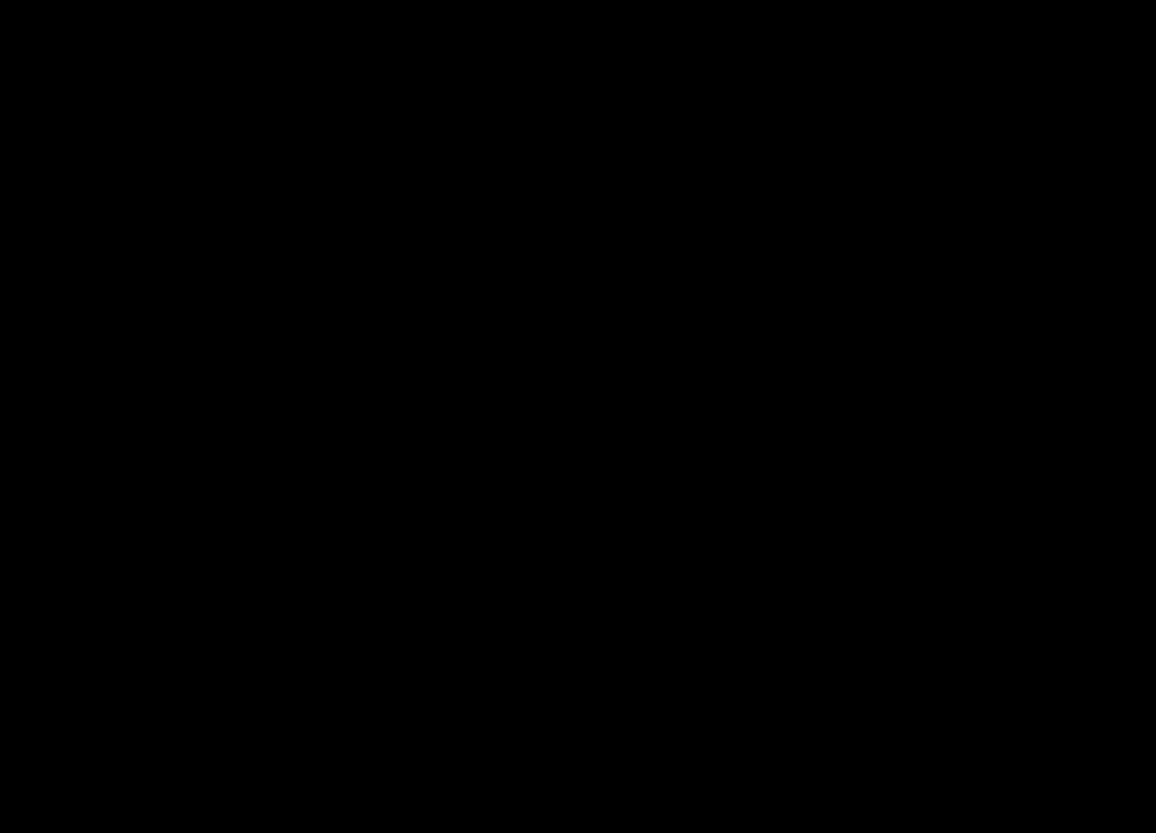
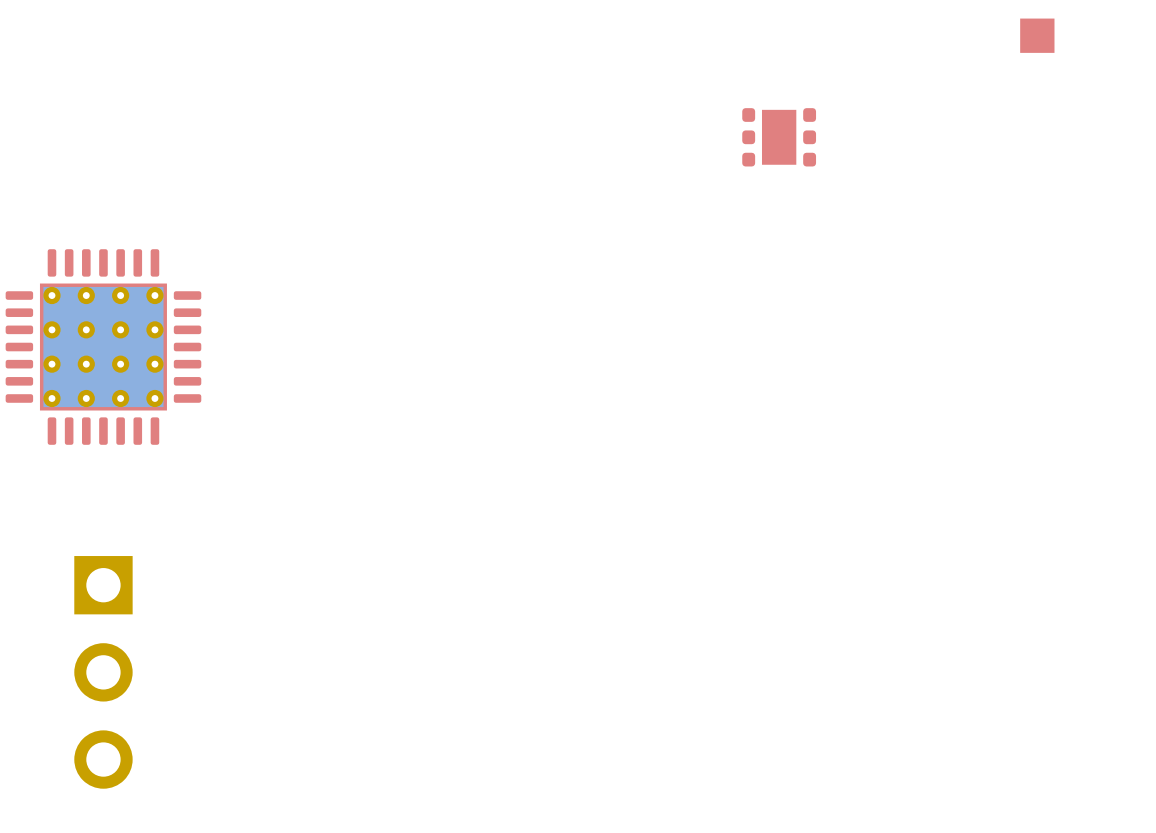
part: none -> (1037, 35)
part: none -> (779, 137)
part: none -> (103, 347)
part: none -> (103, 672)

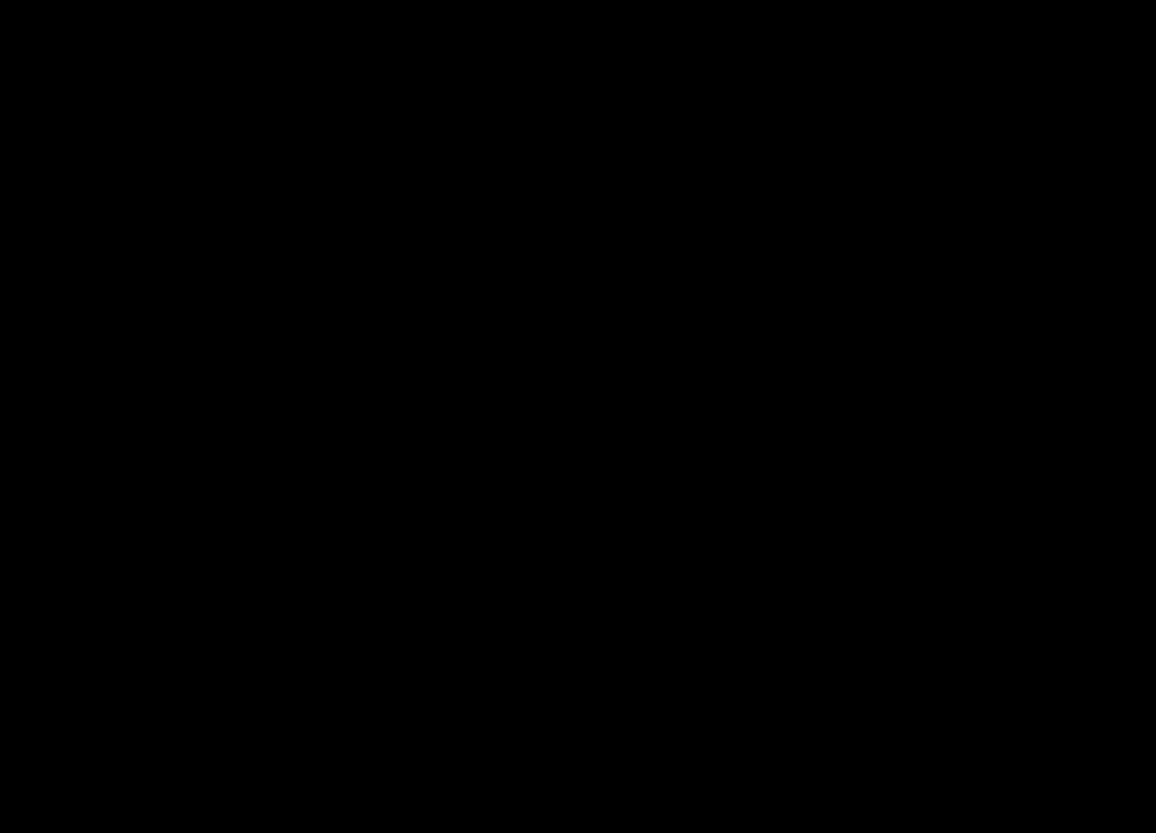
part: (1037, 35) -> none
part: (779, 137) -> none
part: (103, 347) -> none
part: (103, 672) -> none

